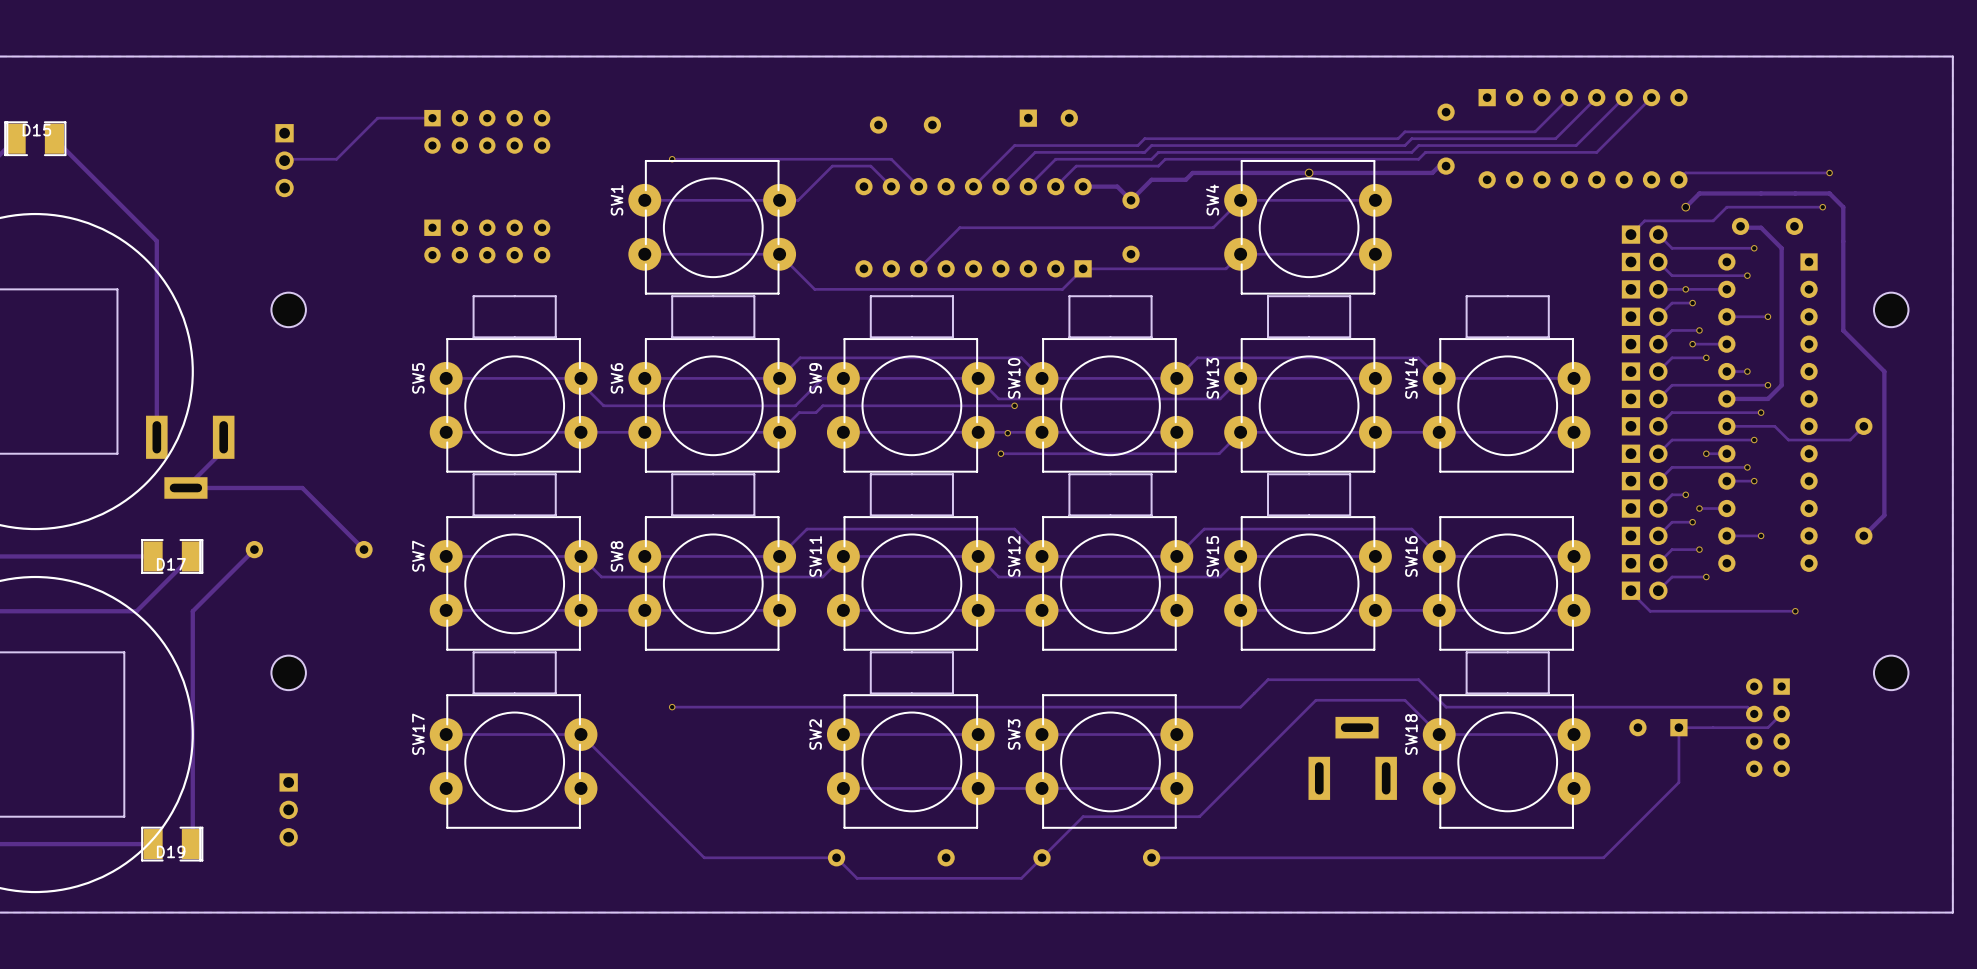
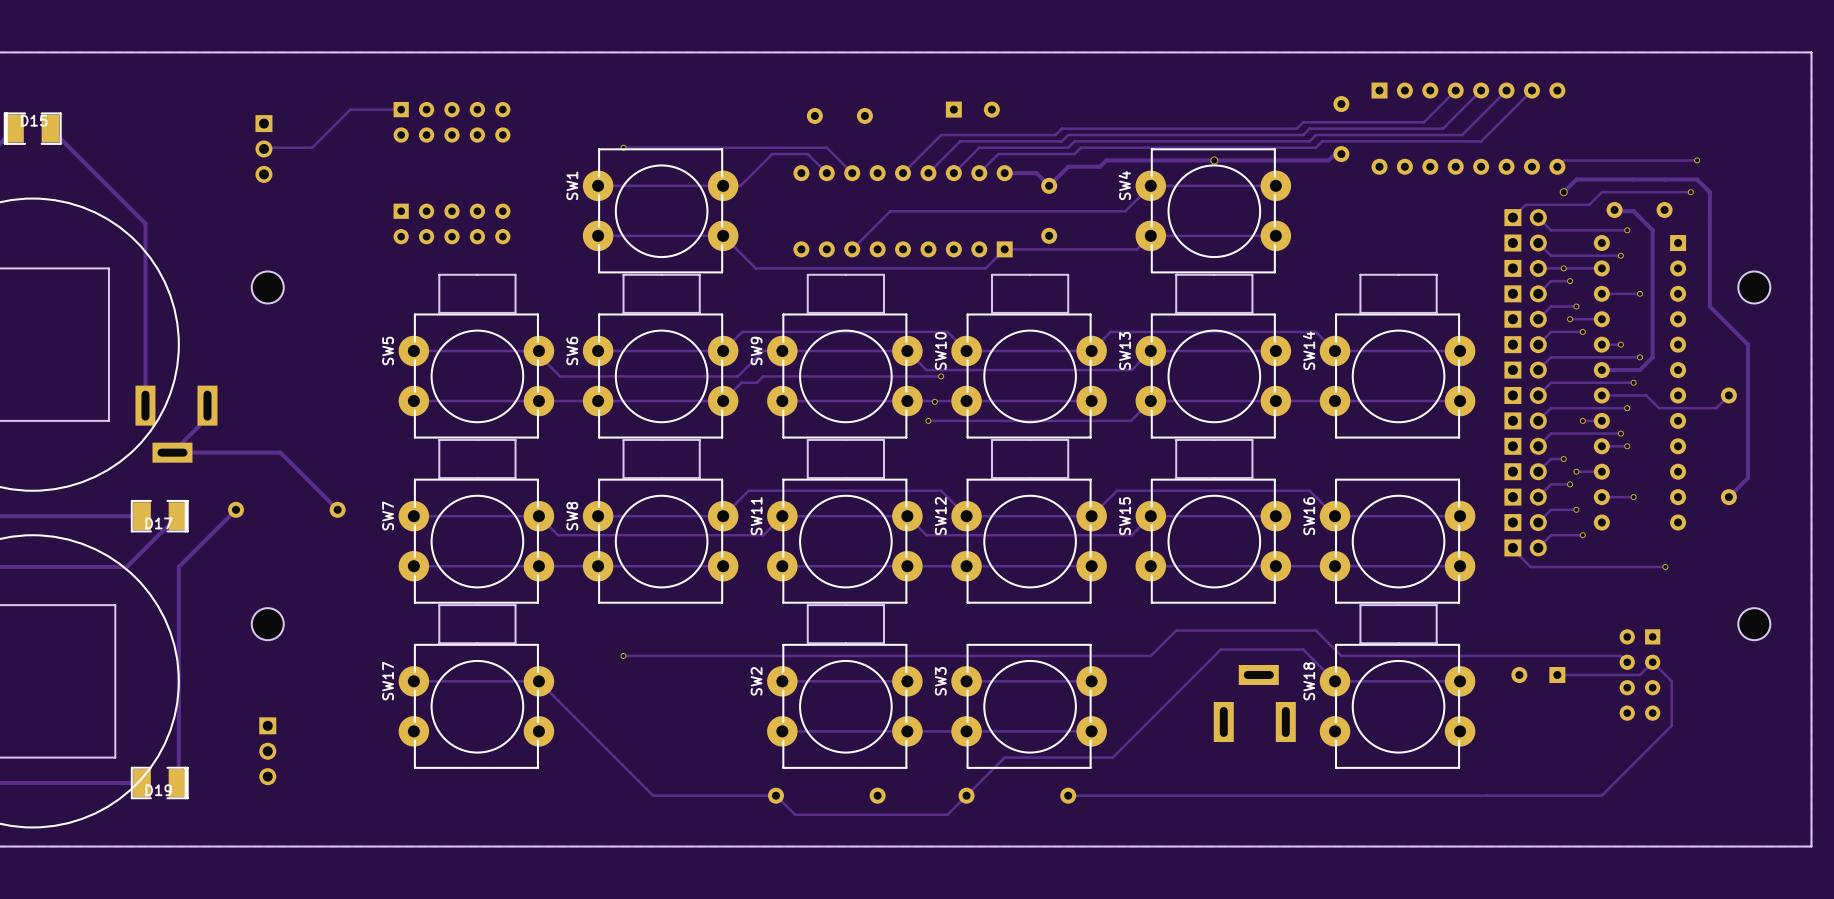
track: (1678, 727) (1678, 782) (1603, 857) -> (1652, 662) (1671, 681) (1671, 725) (1601, 795) (1487, 795)

